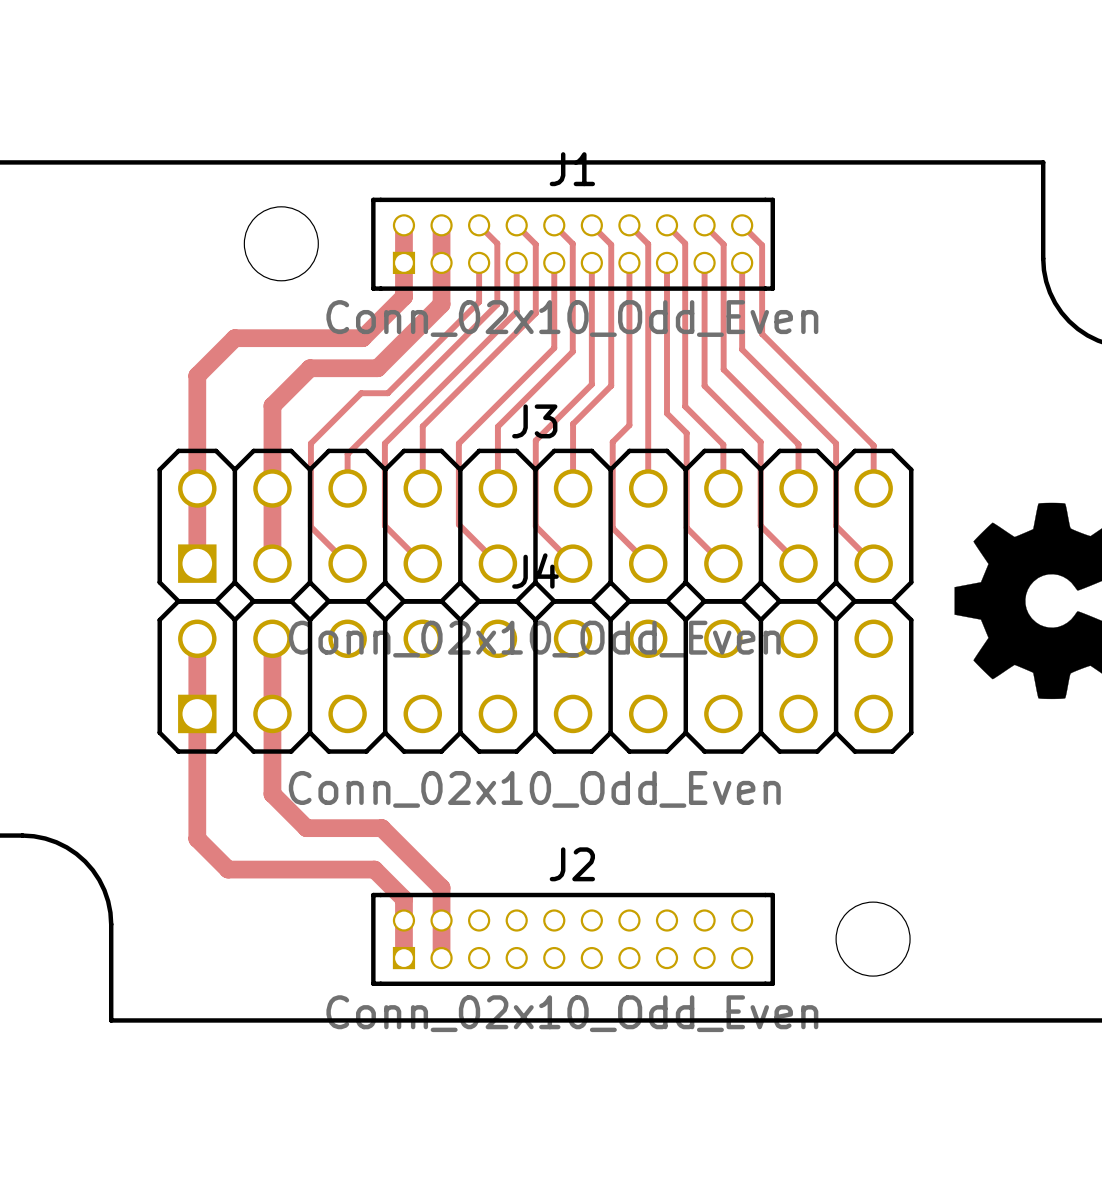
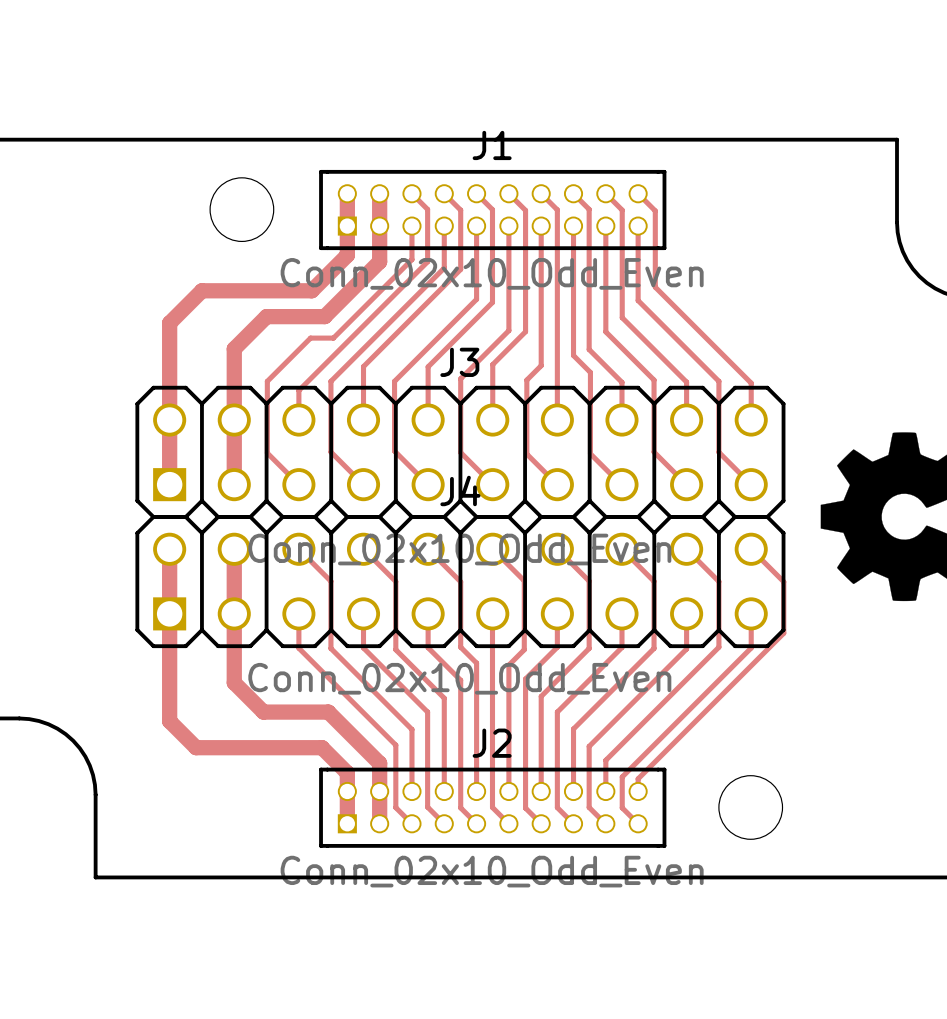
top track: none -> (298, 549) (330, 581) (330, 648) (411, 729) (411, 791)
top track: none -> (363, 549) (395, 581) (395, 649) (444, 698) (444, 791)
top track: none -> (428, 549) (460, 581) (460, 647) (476, 663) (476, 791)
top track: none -> (492, 549) (524, 580) (524, 649) (508, 665) (508, 791)
top track: none -> (557, 549) (589, 581) (589, 648) (541, 696) (541, 791)
top track: none -> (621, 549) (654, 581) (654, 648) (573, 729) (573, 791)
top track: none -> (686, 549) (718, 581) (718, 647) (605, 760) (605, 791)
top track: none -> (751, 549) (783, 581) (783, 633) (638, 778) (638, 791)
top track: none -> (298, 613) (298, 648) (395, 745) (395, 807) (411, 823)
top track: none -> (363, 613) (363, 647) (427, 712) (427, 807) (444, 823)
top track: none -> (428, 613) (428, 647) (460, 680) (460, 807) (476, 823)
top track: none -> (557, 613) (557, 647) (525, 679) (525, 808) (541, 823)
top track: none -> (621, 613) (621, 647) (557, 712) (557, 807) (573, 823)
top track: none -> (686, 613) (686, 648) (589, 746) (589, 807) (605, 823)
top track: none -> (751, 613) (751, 647) (622, 776) (622, 807) (638, 823)
top track: none -> (492, 614) (492, 807) (508, 823)

